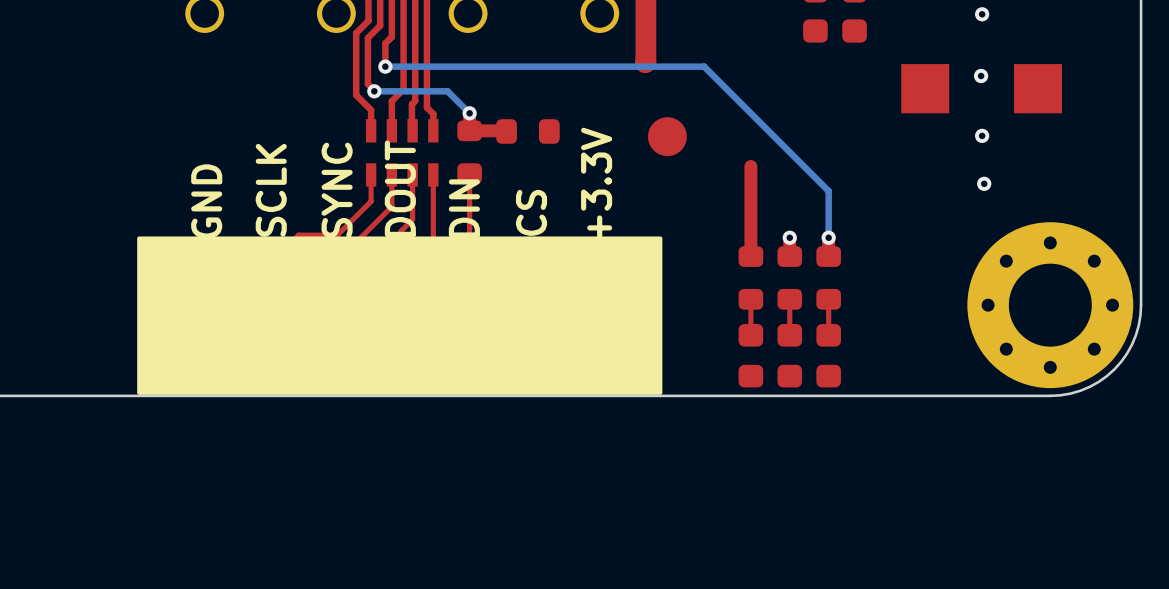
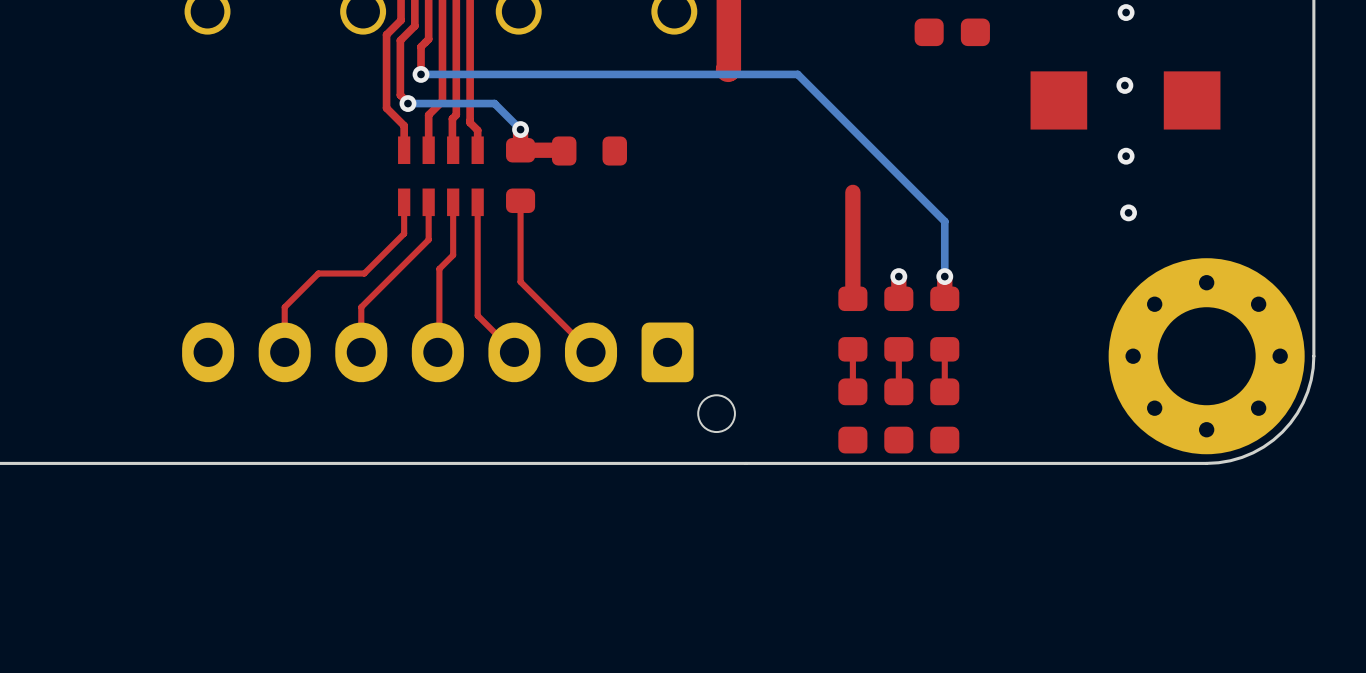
part: (667, 136) -> none
text: +3.3V (596, 184) -> none
text: DOUT (400, 188) -> none
text: SCLK (271, 190) -> none
text: SYNC (337, 190) -> none
text: GND (206, 201) -> none
text: DIN (464, 208) -> none
text: CS (531, 212) -> none
drawing: [137, 236, 663, 395] -> none

